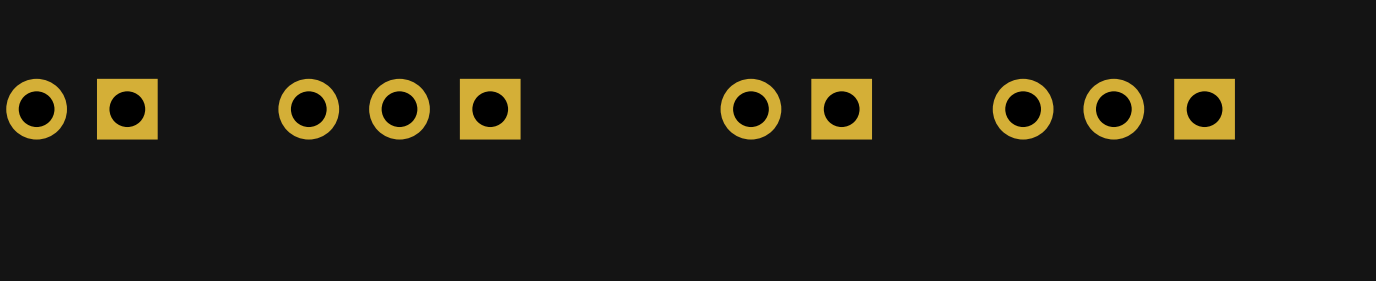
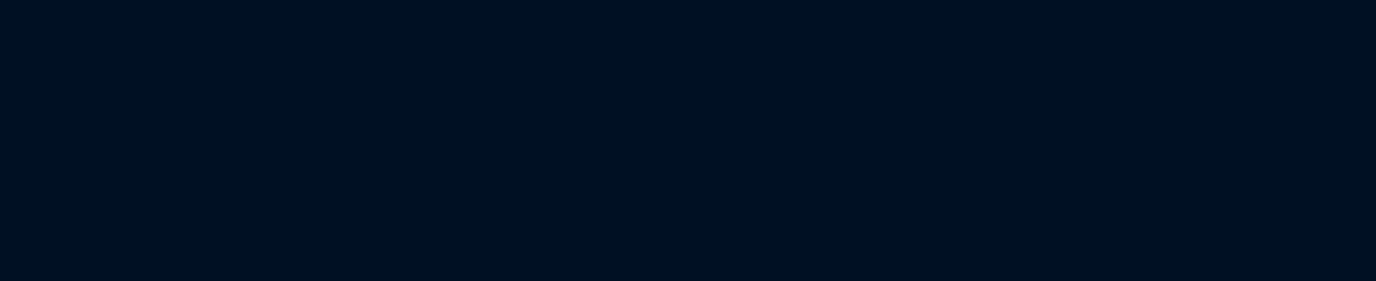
part: (81, 109) -> none
part: (399, 109) -> none
part: (796, 109) -> none
part: (1113, 109) -> none

